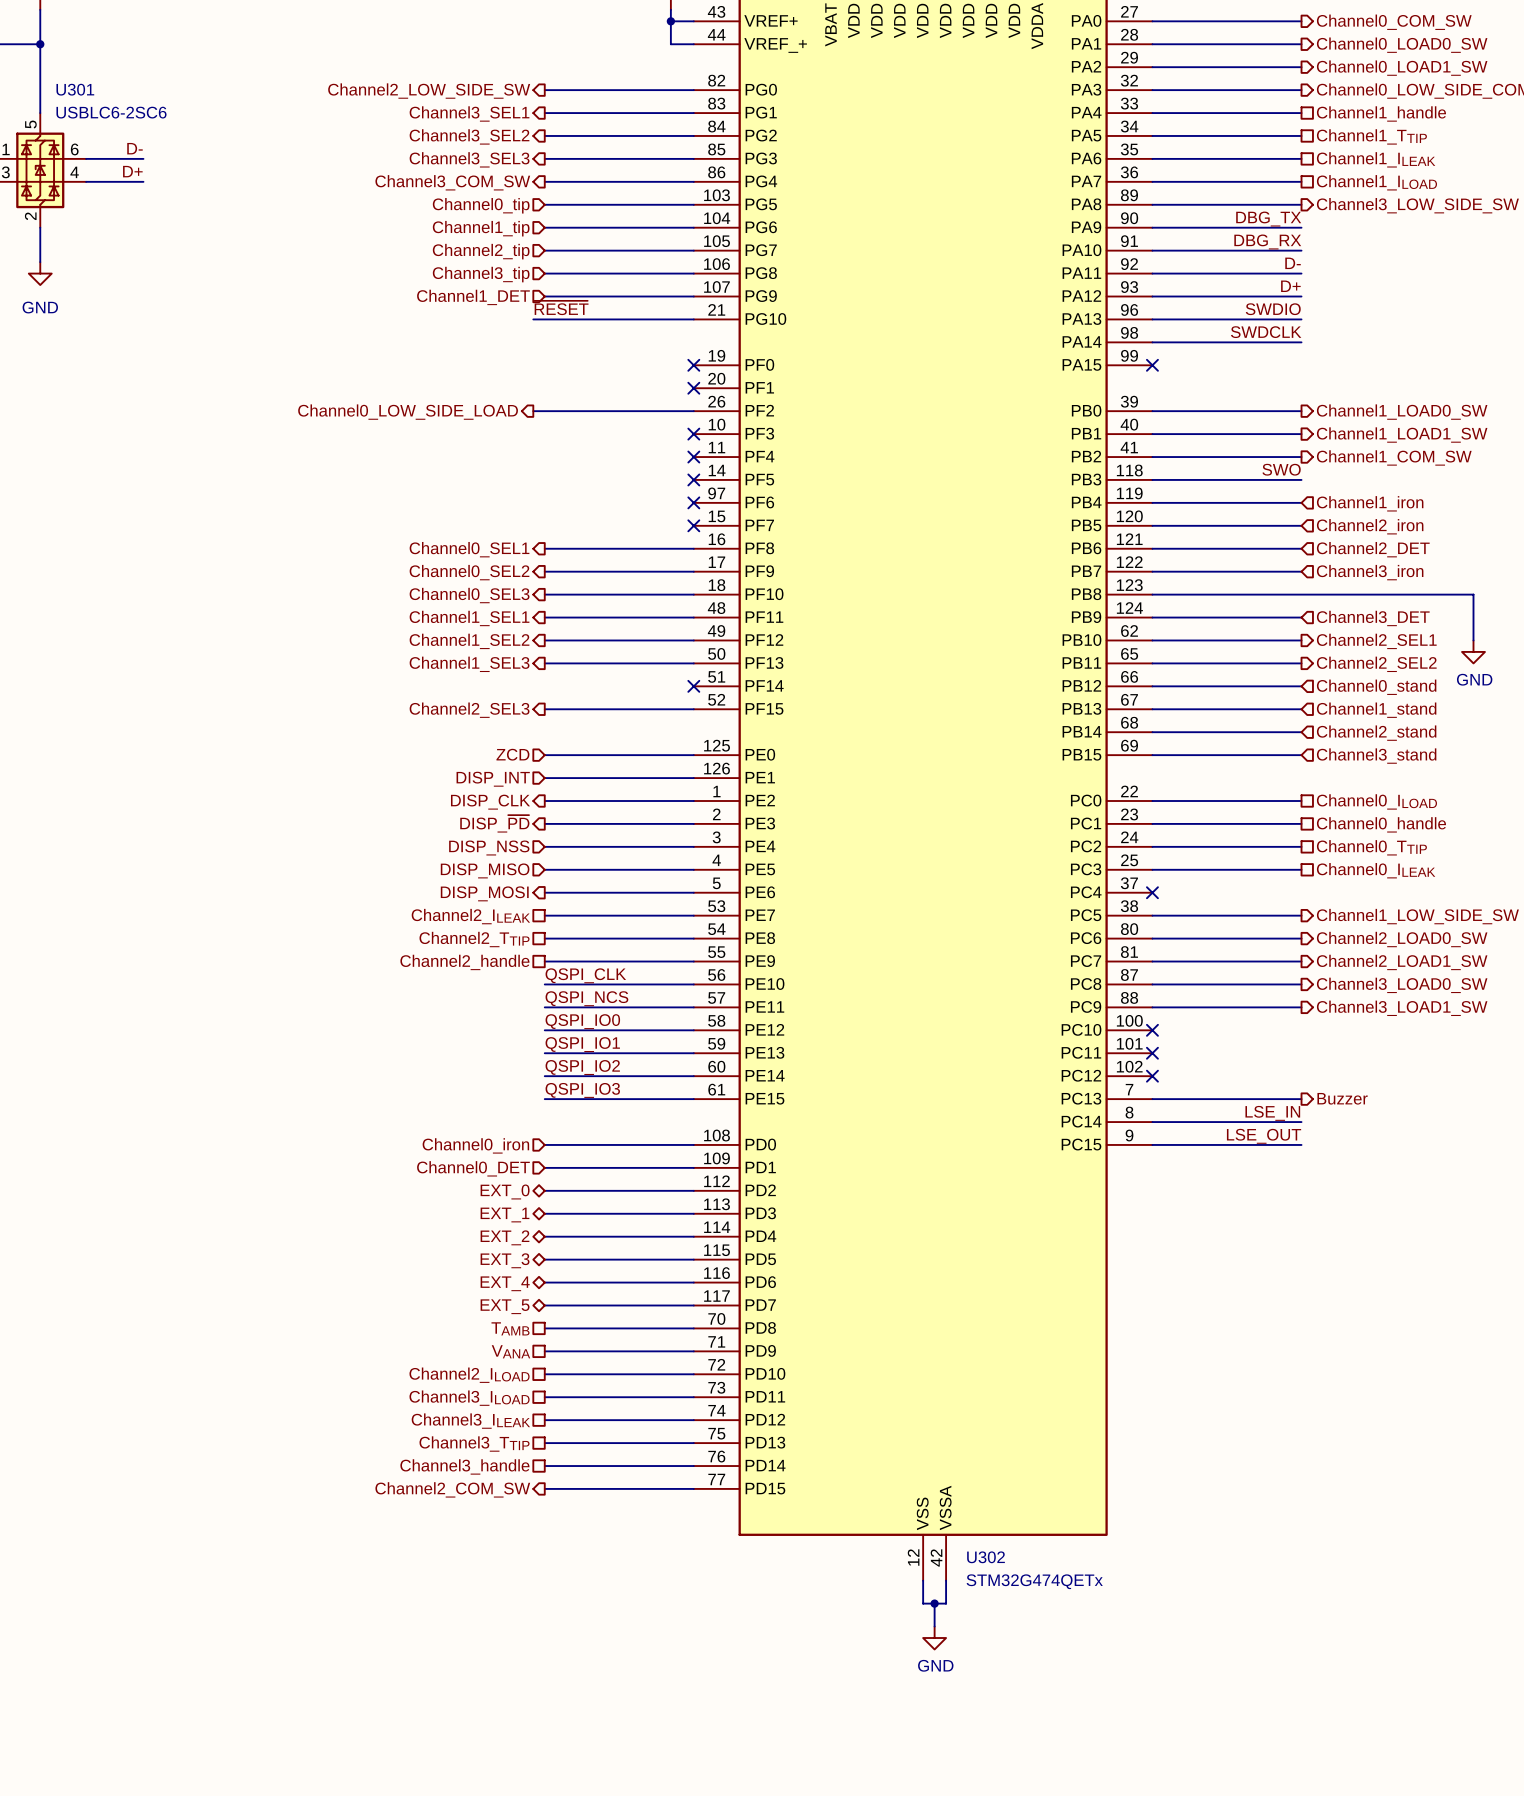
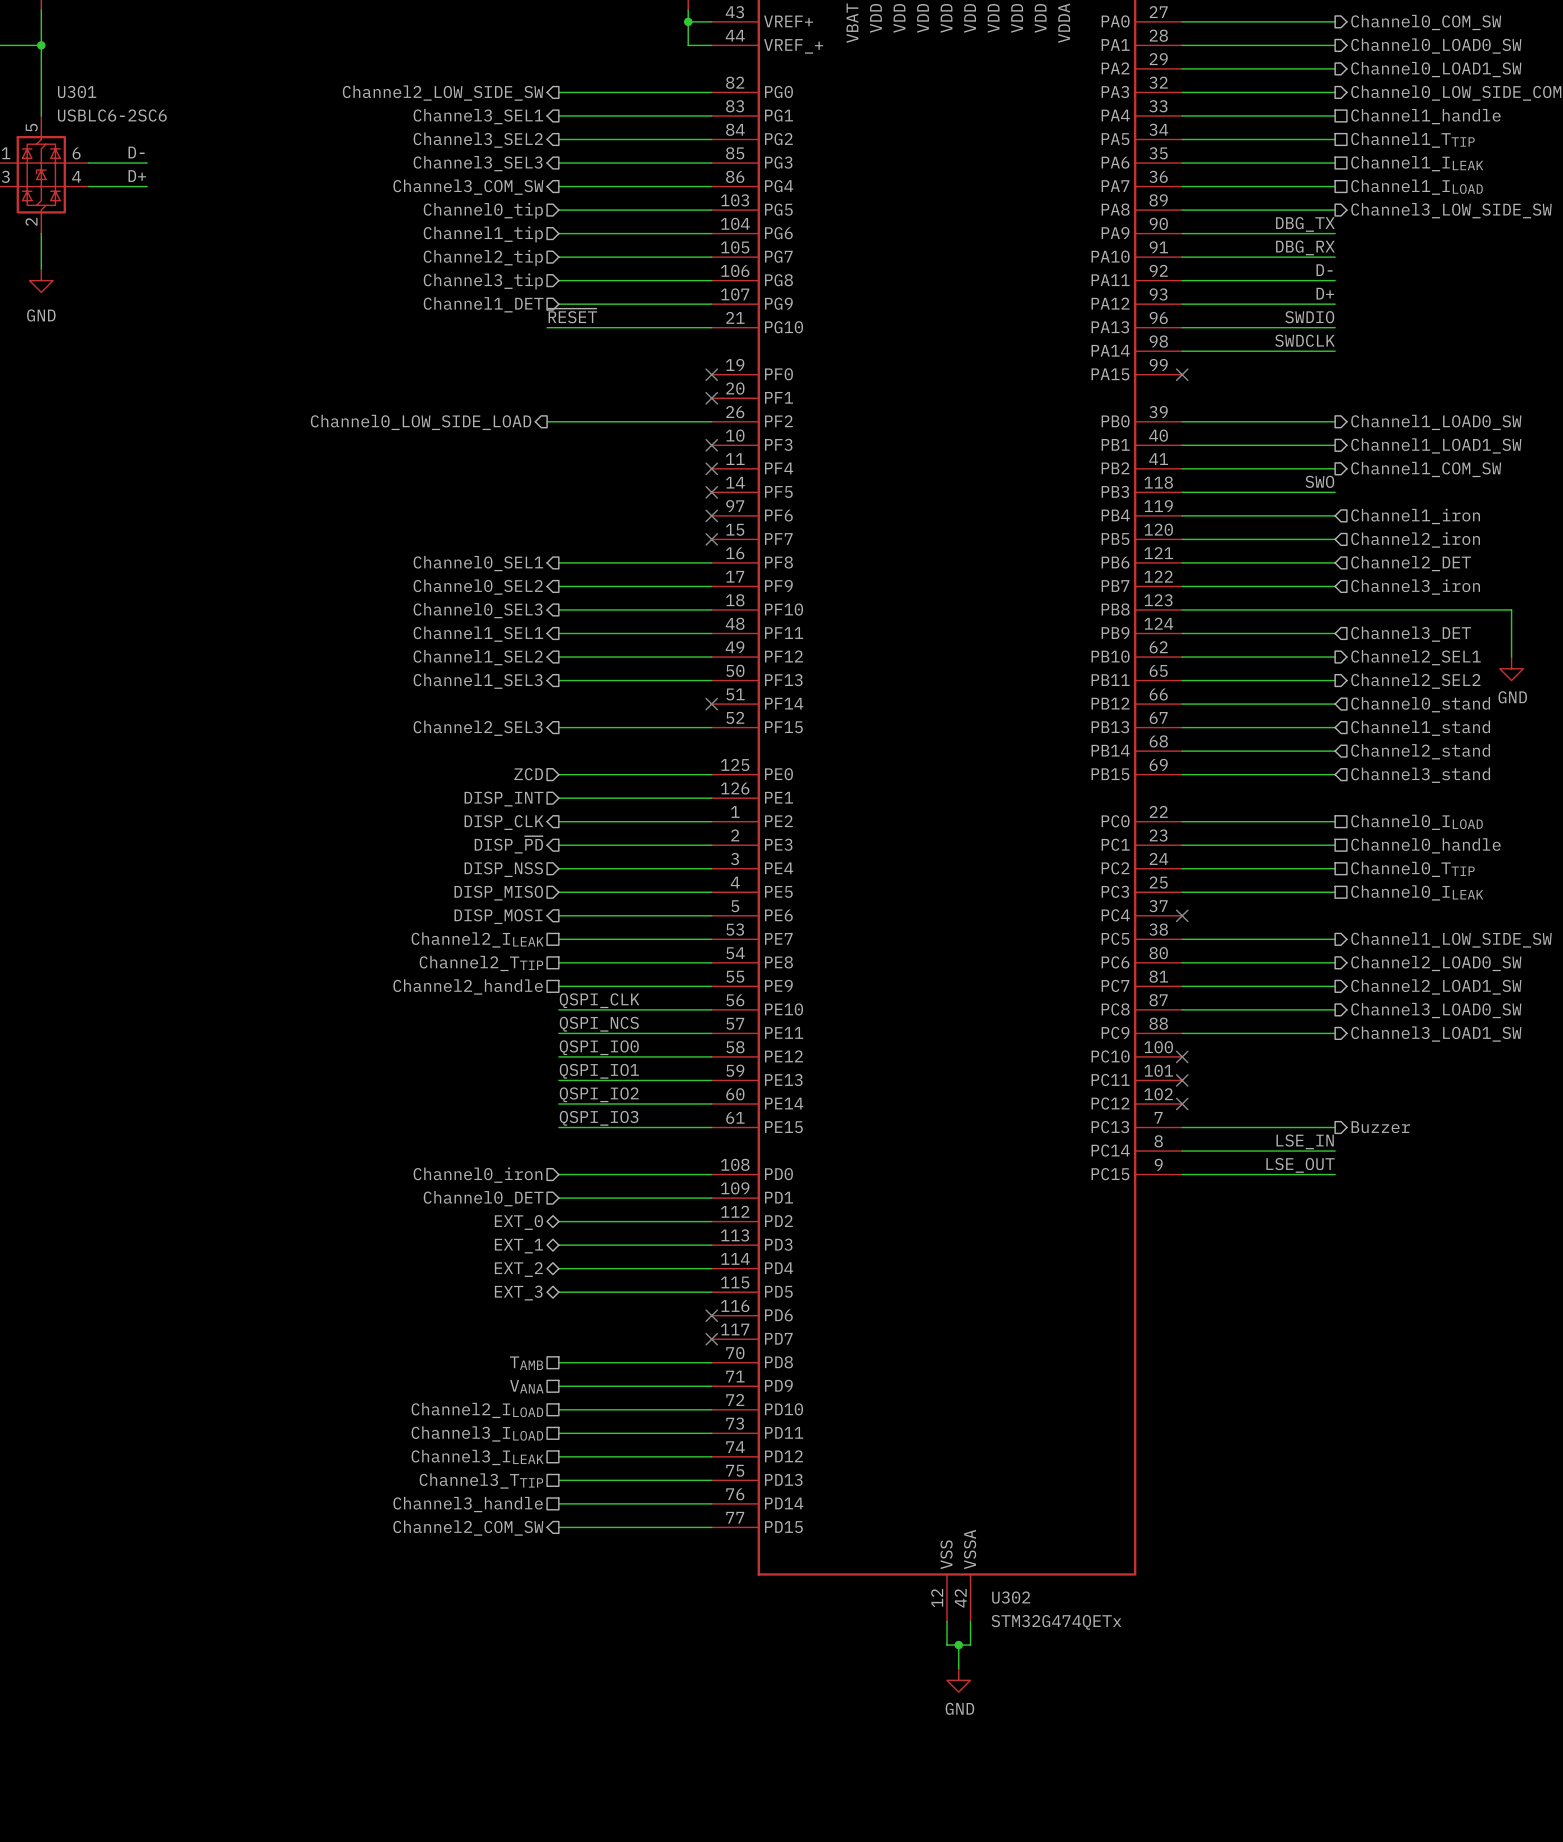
wire: (544, 1282) (693, 1282) -> none
no-connect mark: none -> (711, 1315)
hierarchical label: EXT_4 (505, 1283) -> none
wire: (544, 1305) (693, 1305) -> none
no-connect mark: none -> (711, 1339)
hierarchical label: EXT_5 (505, 1306) -> none

